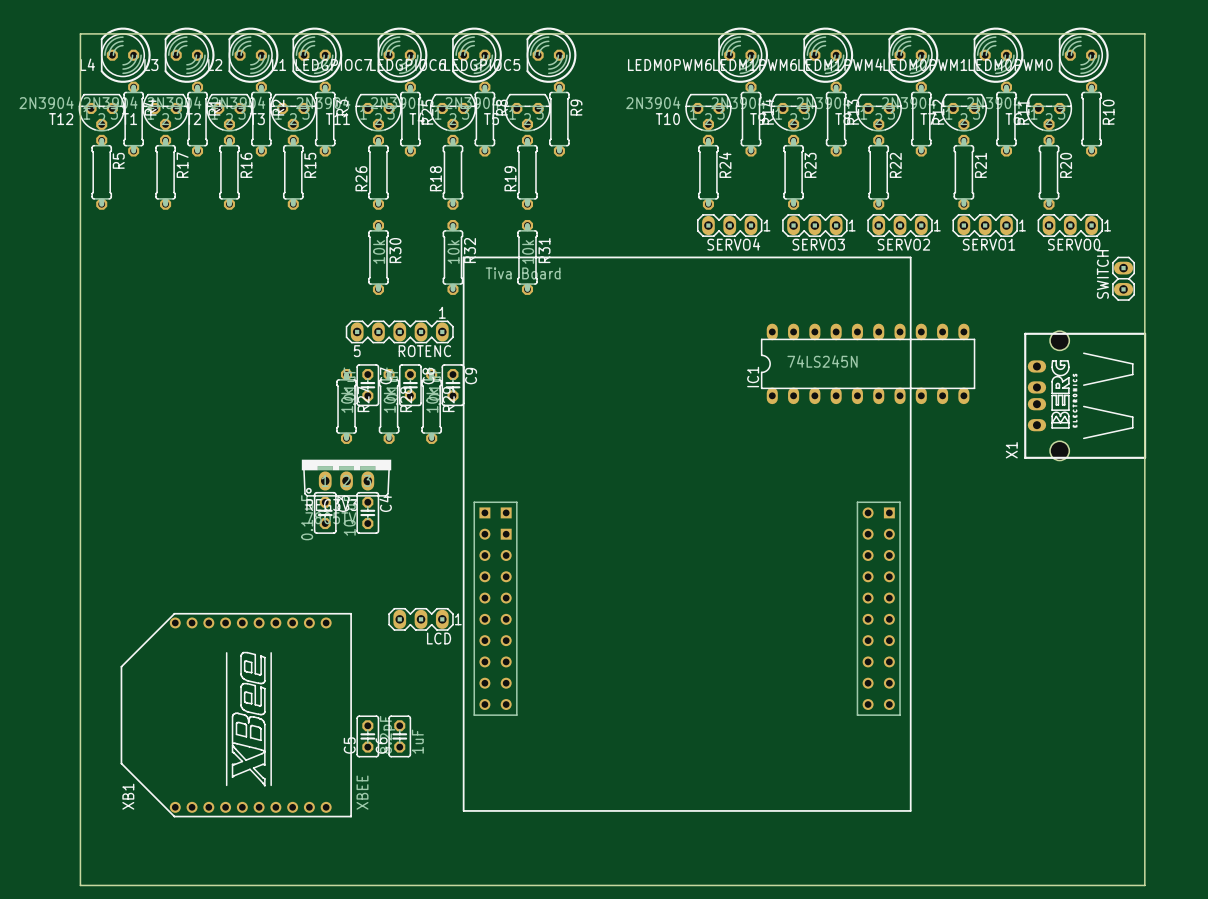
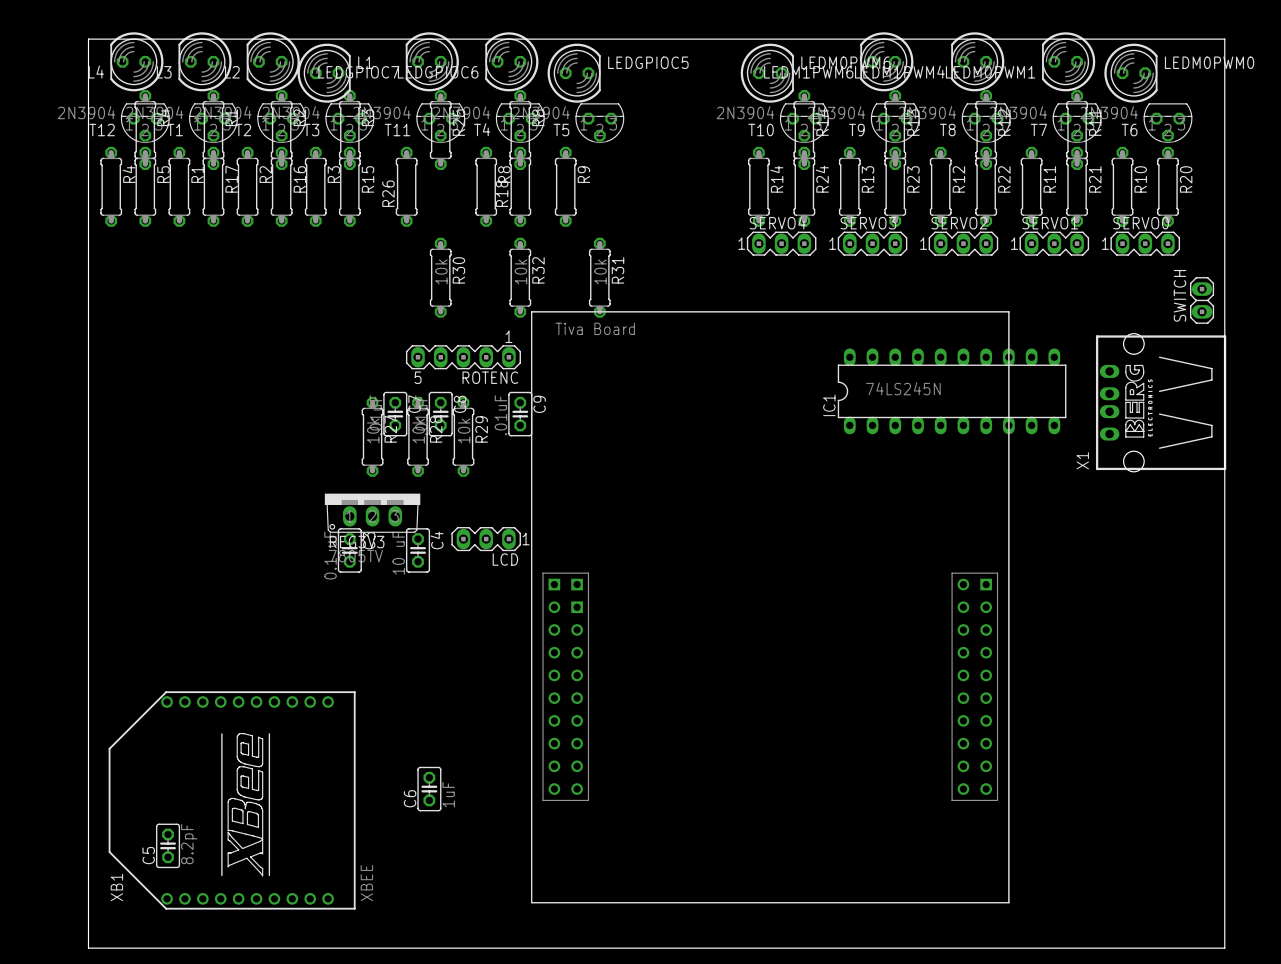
L1 rotation: 0° (317, 55) -> 180° (324, 73)
LEDGPIOC5 rotation: 0° (551, 55) -> 180° (574, 73)
LEDM0PWM6 rotation: 0° (743, 55) -> 180° (767, 73)
LEDM0PWM0 rotation: 0° (1083, 55) -> 180° (1131, 73)
T12 position: (101, 112) -> (145, 123)
T1 position: (165, 112) -> (213, 123)
T2 position: (229, 112) -> (281, 123)
T3 position: (293, 112) -> (349, 123)
T11 position: (378, 112) -> (440, 123)
T4 position: (452, 112) -> (520, 123)
T5 position: (527, 112) -> (599, 123)
T10 position: (708, 112) -> (804, 123)
T9 position: (793, 112) -> (895, 123)
T8 position: (878, 112) -> (986, 123)
T7 position: (963, 112) -> (1077, 123)
T6 position: (1049, 112) -> (1167, 123)
R9: (559, 119) -> none
R10: (1091, 119) -> none
R5 name: R5 (118, 160) -> R4 (129, 174)
R17 name: R17 (182, 165) -> R1 (197, 174)
R16 name: R16 (246, 165) -> R2 (265, 174)
R15 name: R15 (310, 165) -> R3 (333, 174)
R24 name: R24 (725, 165) -> R14 (776, 179)
R23 name: R23 (810, 165) -> R13 (867, 179)
R22 name: R22 (895, 165) -> R12 (958, 179)
R21 name: R21 (980, 165) -> R11 (1049, 179)
R20 name: R20 (1066, 165) -> R10 (1140, 179)
R5: none -> (145, 186)
R17: none -> (213, 186)
R16: none -> (281, 186)
R15: none -> (349, 186)
R18: none -> (520, 186)
R24: none -> (804, 186)
R23: none -> (895, 186)
R22: none -> (986, 186)
R21: none -> (1077, 186)
R20: none -> (1167, 186)
R18 name: R18 (435, 178) -> R8 (504, 174)
R19 name: R19 (510, 178) -> R9 (583, 174)
SERVO4 text position: 1 (767, 225) -> 1 (741, 243)
SERVO3 text position: 1 (852, 225) -> 1 (832, 243)
SERVO2 text position: 1 (937, 225) -> 1 (923, 243)
SERVO1 text position: 1 (1022, 225) -> 1 (1014, 243)
SERVO0 text position: 1 (1107, 225) -> 1 (1105, 243)
SERVO4 name position: SERVO4 (733, 244) -> SERVO4 (777, 222)
SERVO3 name position: SERVO3 (818, 244) -> SERVO3 (868, 223)
SERVO2 name position: SERVO2 (903, 244) -> SERVO2 (959, 223)
SERVO1 name position: SERVO1 (989, 244) -> SERVO1 (1050, 223)
SERVO0 name position: SERVO0 (1074, 244) -> SERVO0 (1141, 223)
R30 position: (378, 257) -> (440, 277)
R32 position: (452, 257) -> (520, 277)
R31 position: (527, 257) -> (599, 277)
ROTENC position: (399, 331) -> (463, 357)
IC1 position: (868, 363) -> (952, 391)
C9 position: (452, 385) -> (520, 414)
X1 position: (1085, 395) -> (1161, 402)
C4 position: (367, 512) -> (418, 550)
part position: (687, 534) -> (770, 607)
LCD position: (421, 619) -> (486, 539)
XB1 position: (236, 715) -> (232, 800)
C5 position: (367, 736) -> (168, 845)

